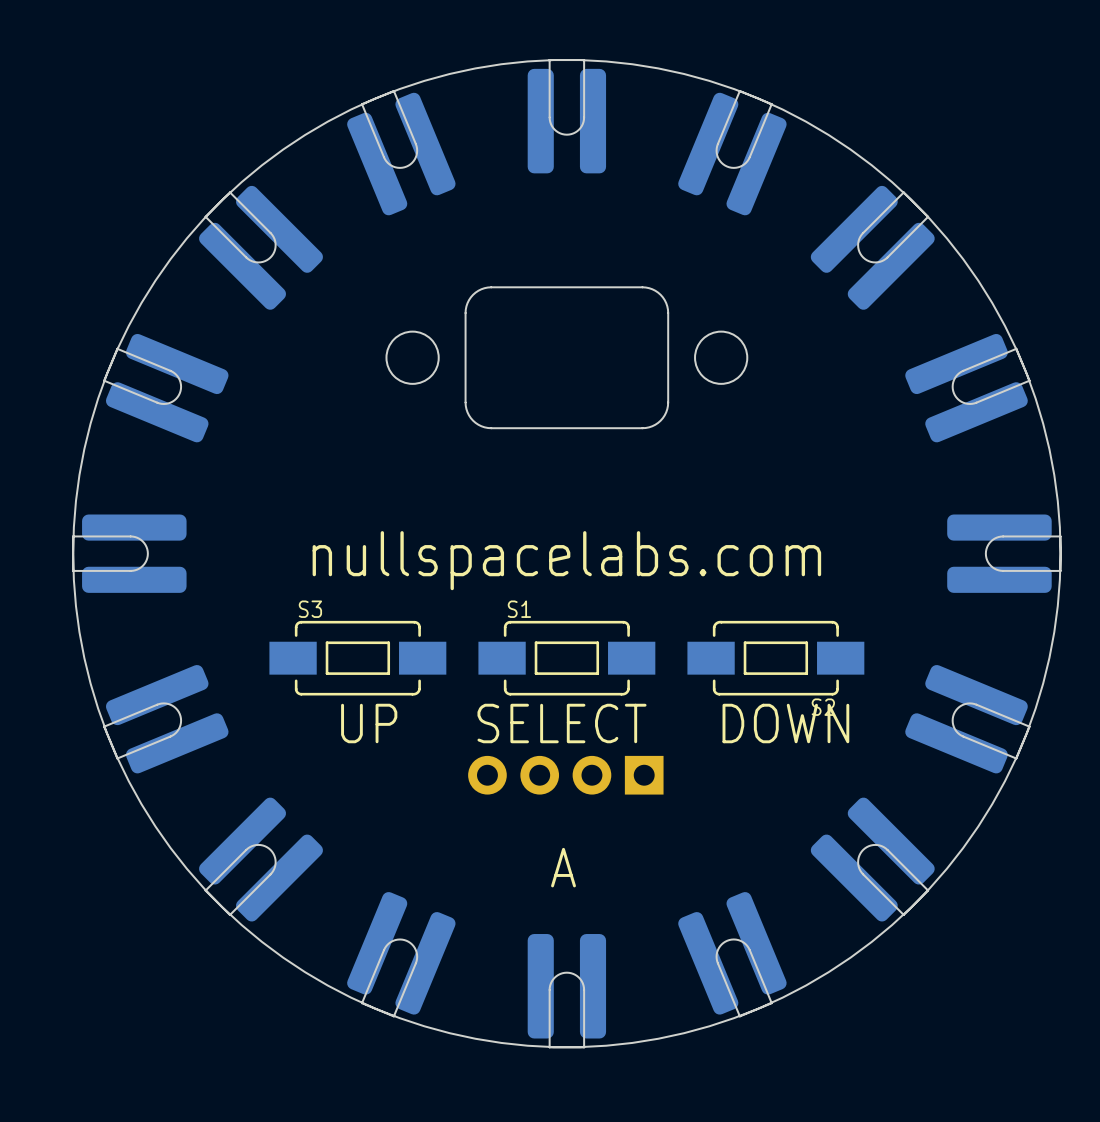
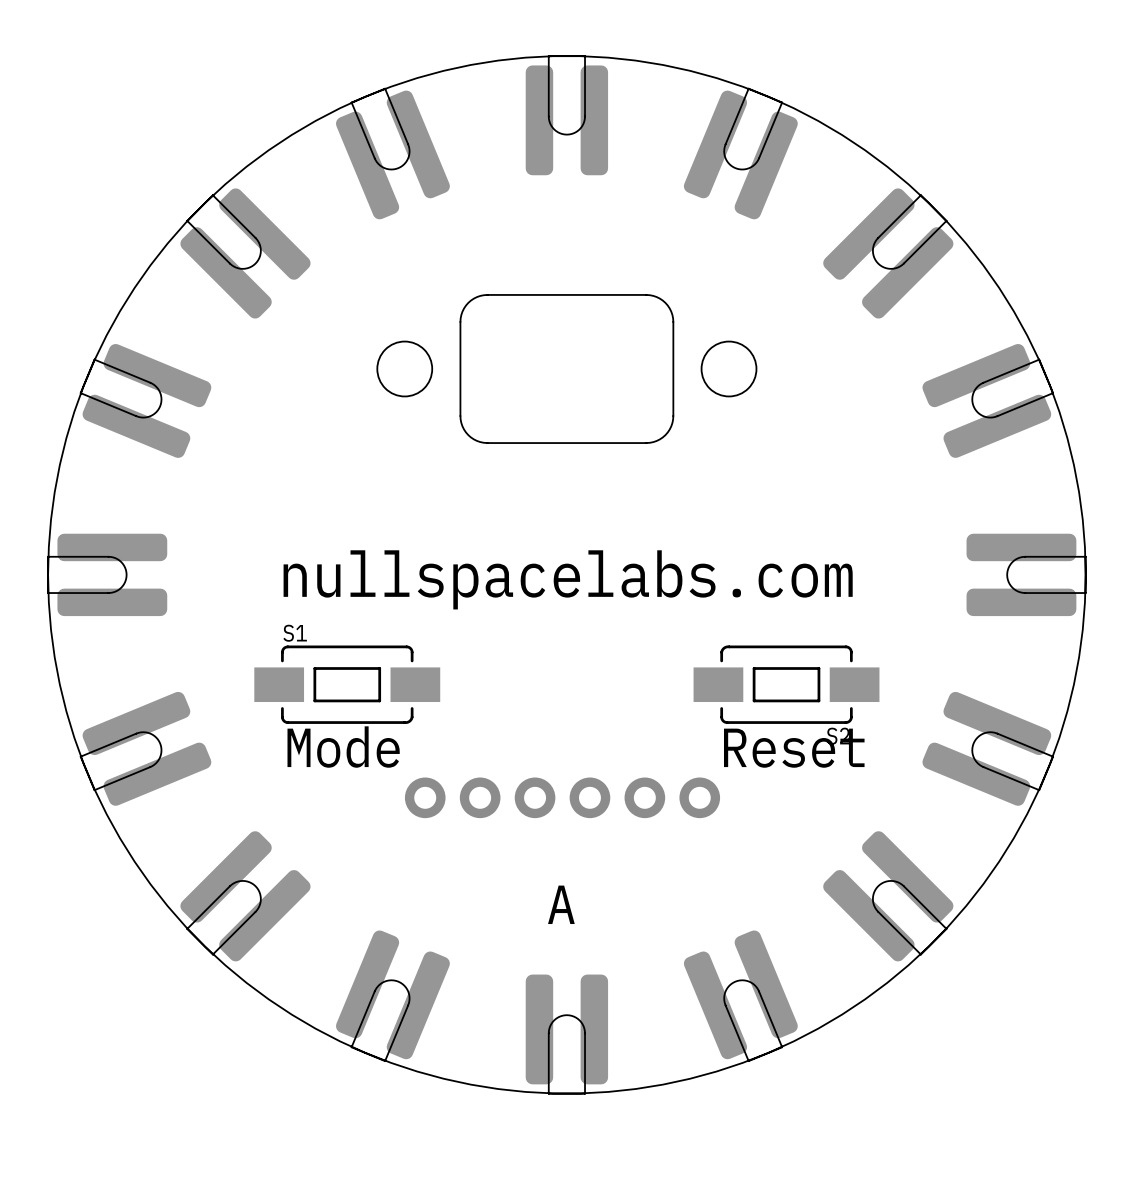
S3 name: S3 (310, 609) -> S1 (295, 633)
S1: (566, 658) -> none
text: none -> Mode (343, 747)
text: UP (369, 723) -> none
text: SELECT (562, 723) -> none
text: DOWN (785, 723) -> Reset (794, 748)
part footprint: [468, 755, 664, 795] -> [404, 777, 721, 819]

